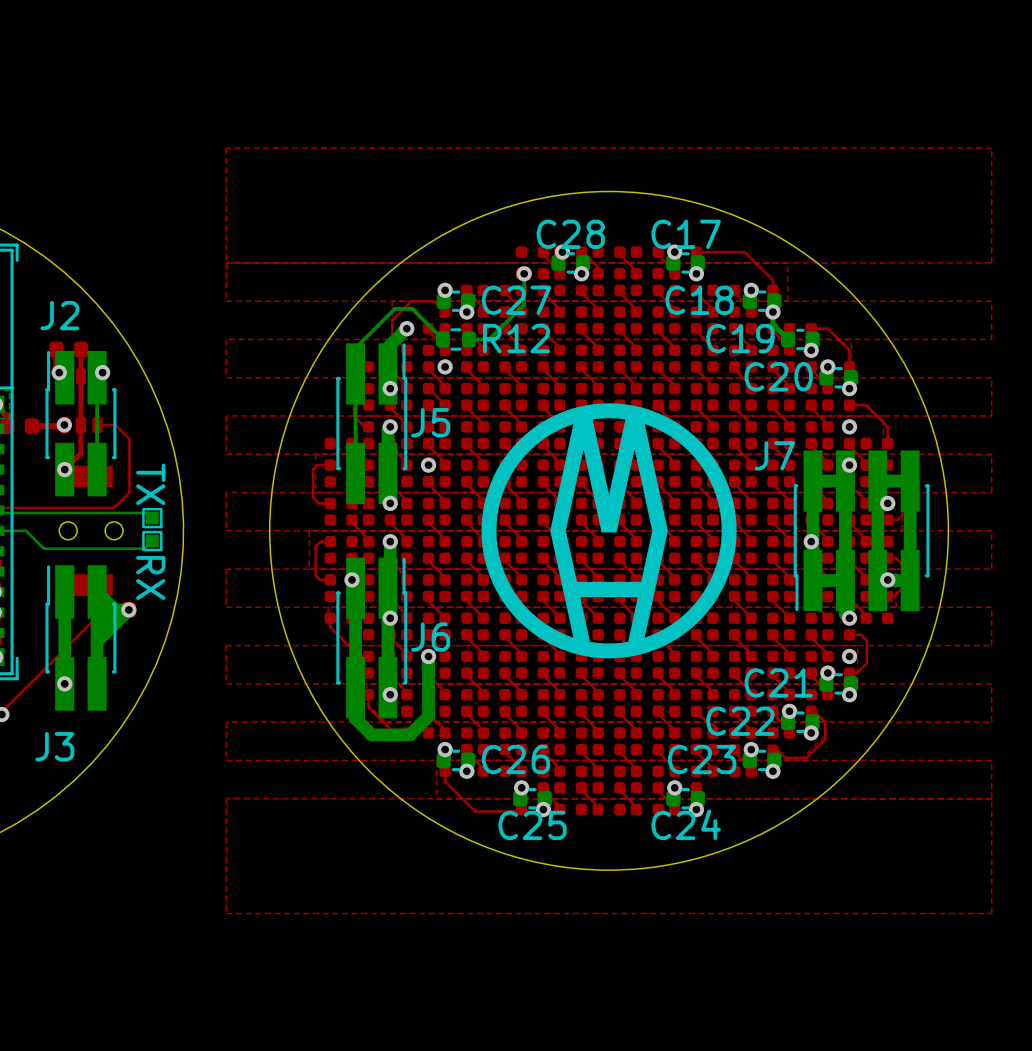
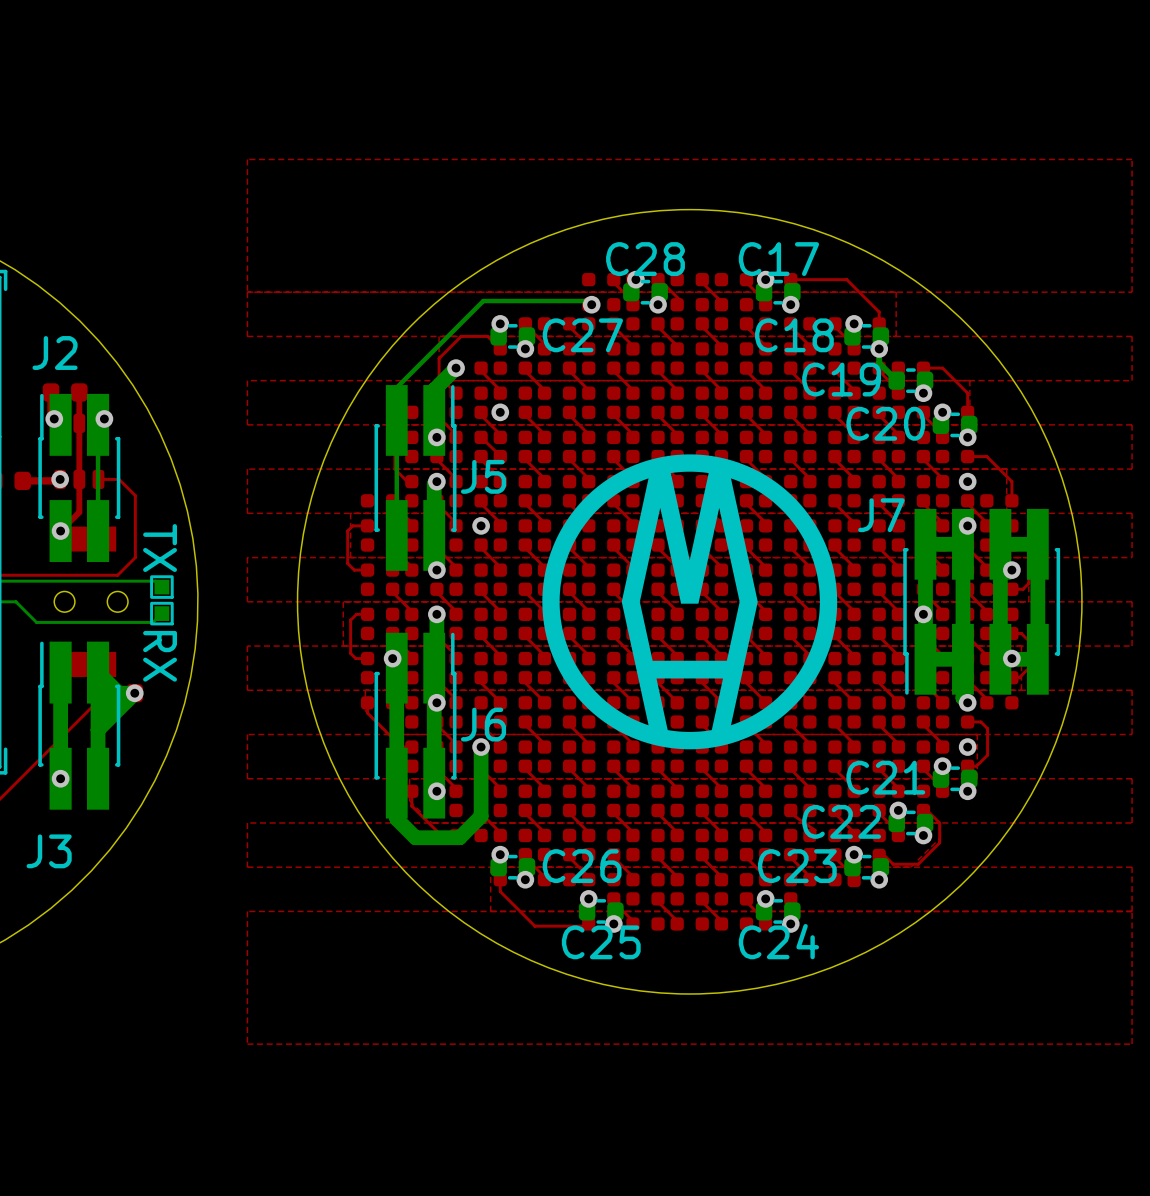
bottom track: (524, 273) (524, 304) (489, 339) (468, 339) -> (591, 304) (588, 301) (483, 301) (396, 387)
bottom track: (442, 339) (412, 308) (394, 308) (355, 348) (355, 373) -> none
R12: (455, 339) -> none

